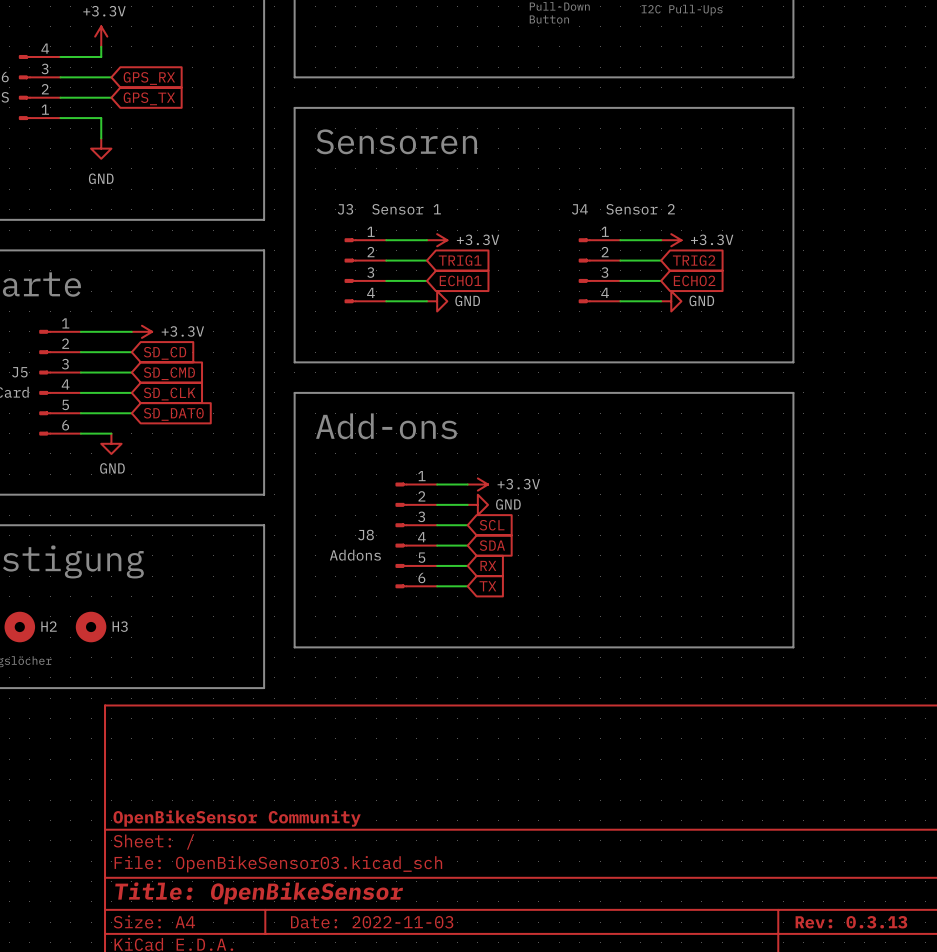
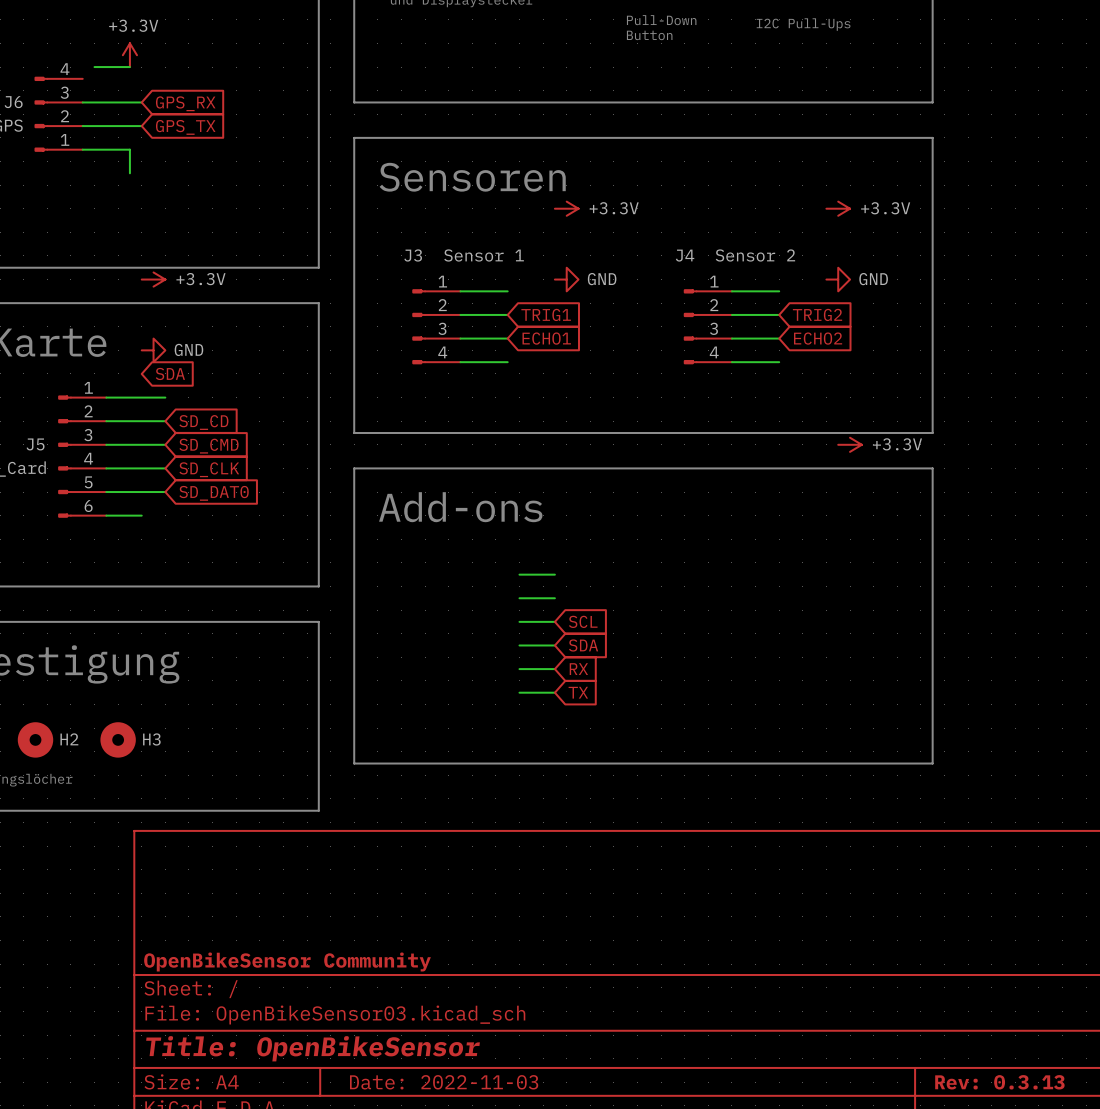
wire: (101, 46) (101, 56) (60, 56) -> (129, 67) (94, 67)
power symbol: GND (101, 148) -> none
power symbol: none -> +3.3V (838, 208)
power symbol position: +3.3V (437, 240) -> +3.3V (566, 208)
power symbol: +3.3V (671, 240) -> none
power symbol: none -> GND (153, 350)
power symbol position: GND (437, 301) -> GND (566, 279)
power symbol position: GND (671, 301) -> GND (838, 279)
global label: none -> SDA (170, 373)
power symbol position: +3.3V (141, 331) -> +3.3V (153, 279)
power symbol: none -> +3.3V (850, 444)
power symbol: GND (111, 443) -> none
power symbol: +3.3V (477, 484) -> none
power symbol: GND (477, 504) -> none
J8: Addons (416, 535) -> none

